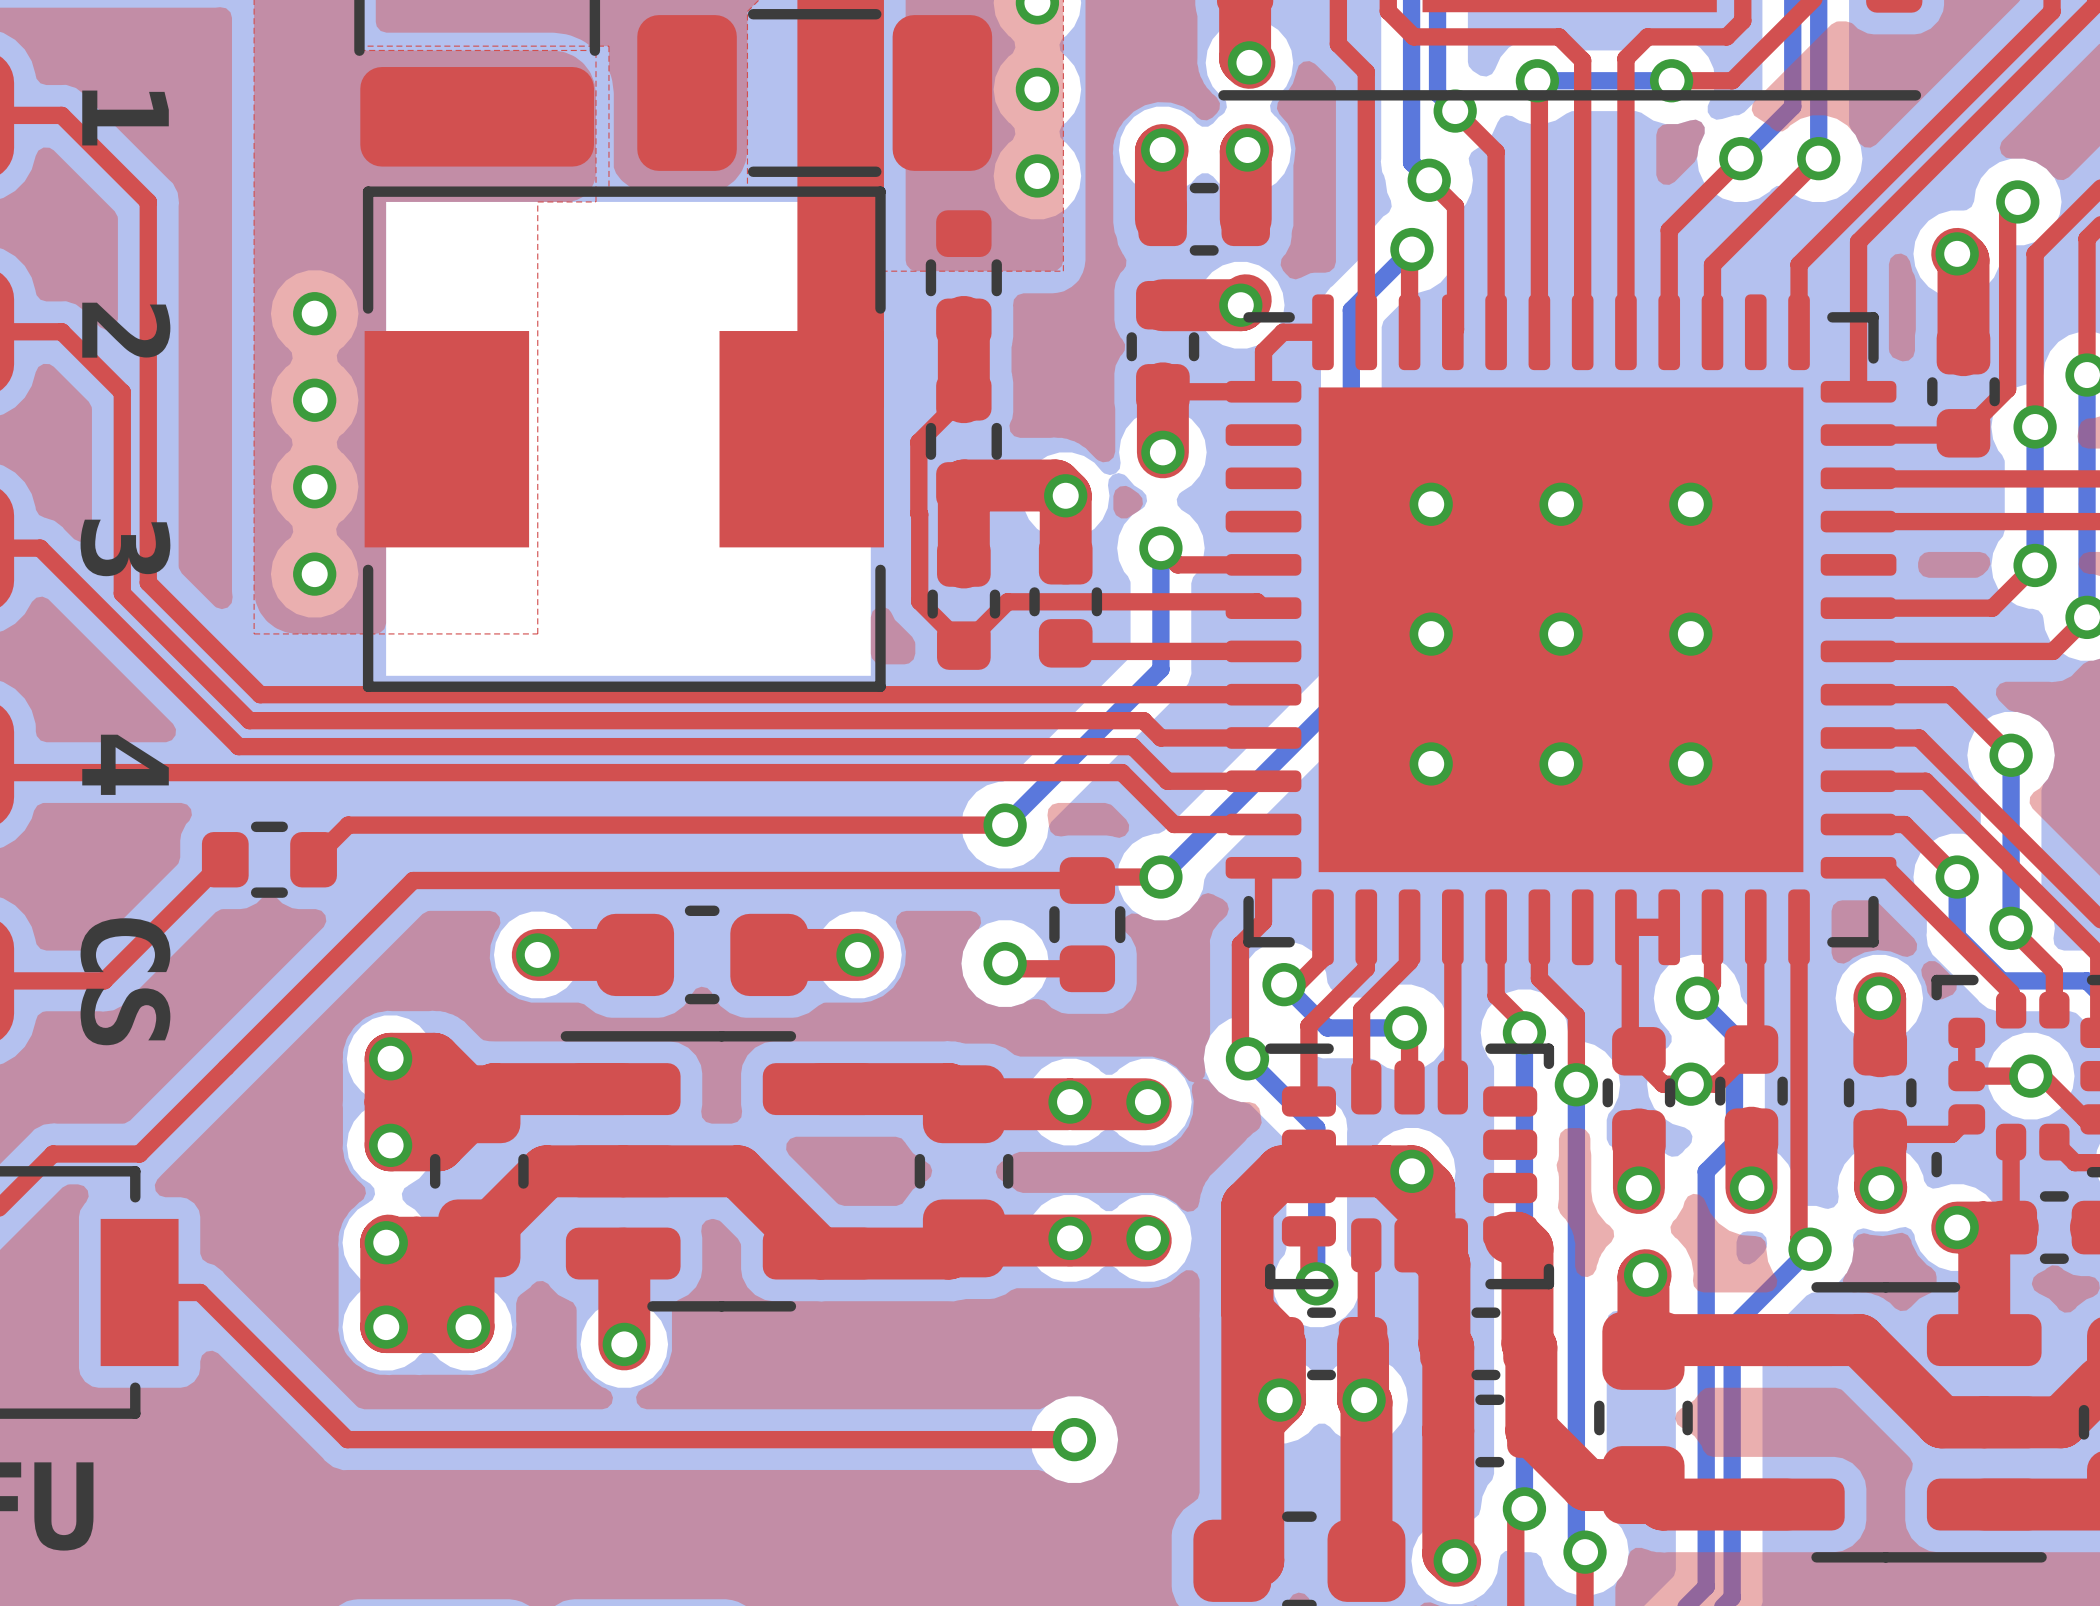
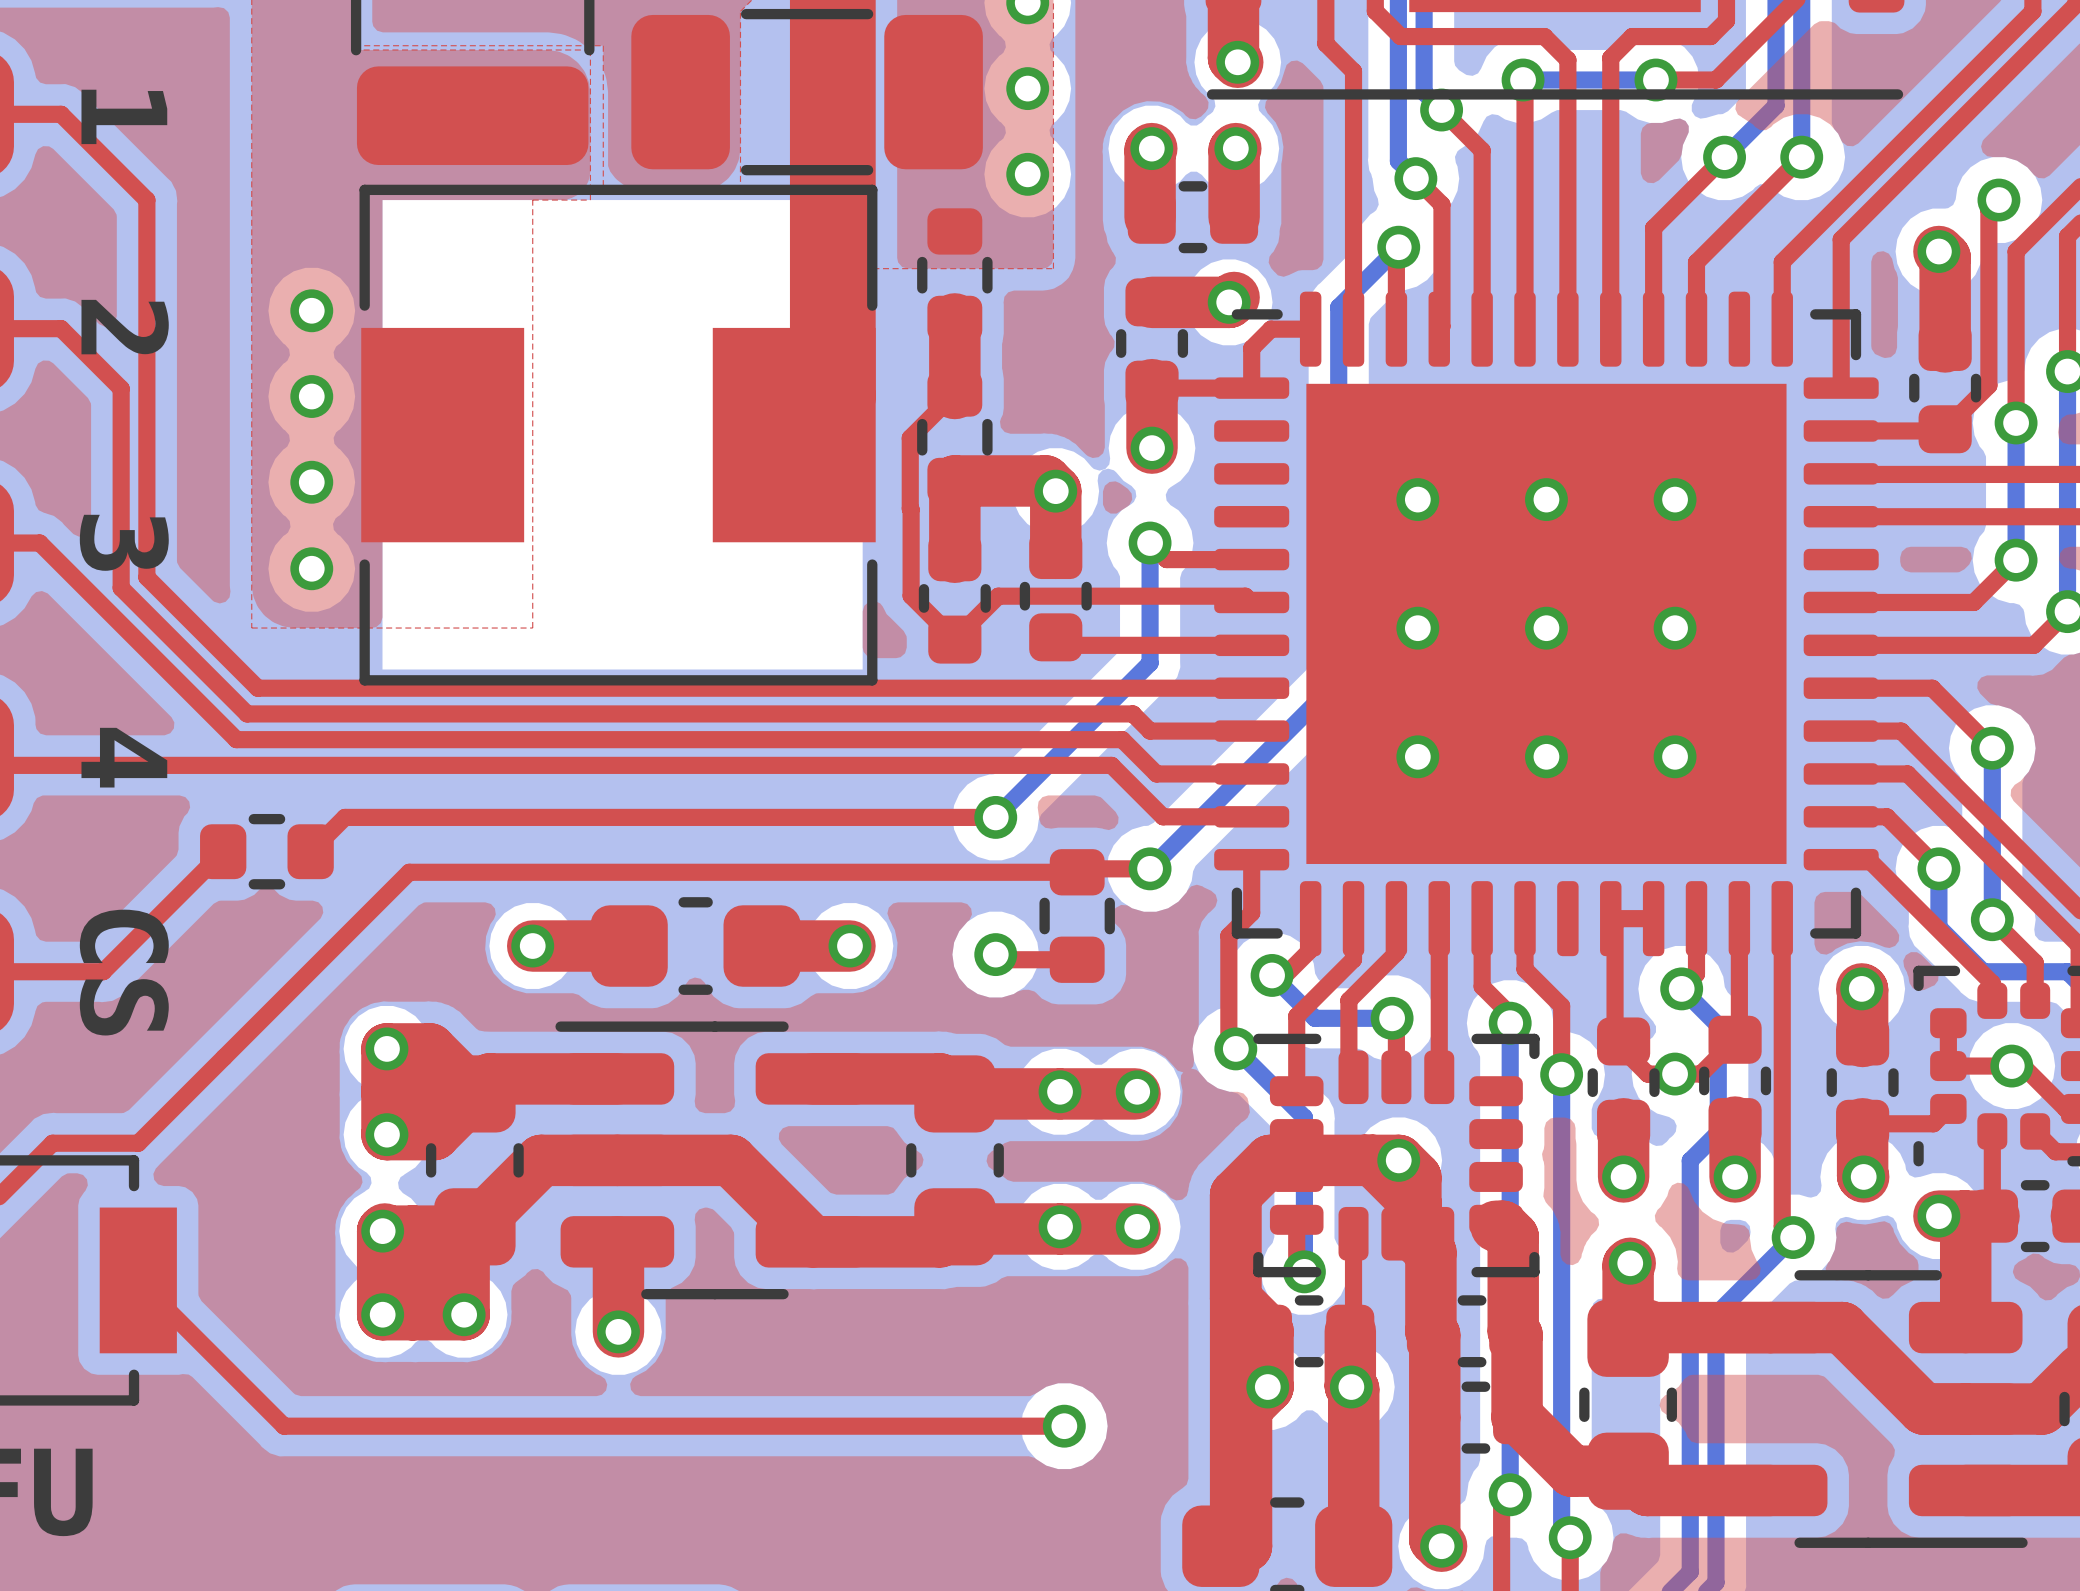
top track: (139, 1292) (200, 1292) (347, 1439) -> (138, 1280) (284, 1426) (344, 1426)

